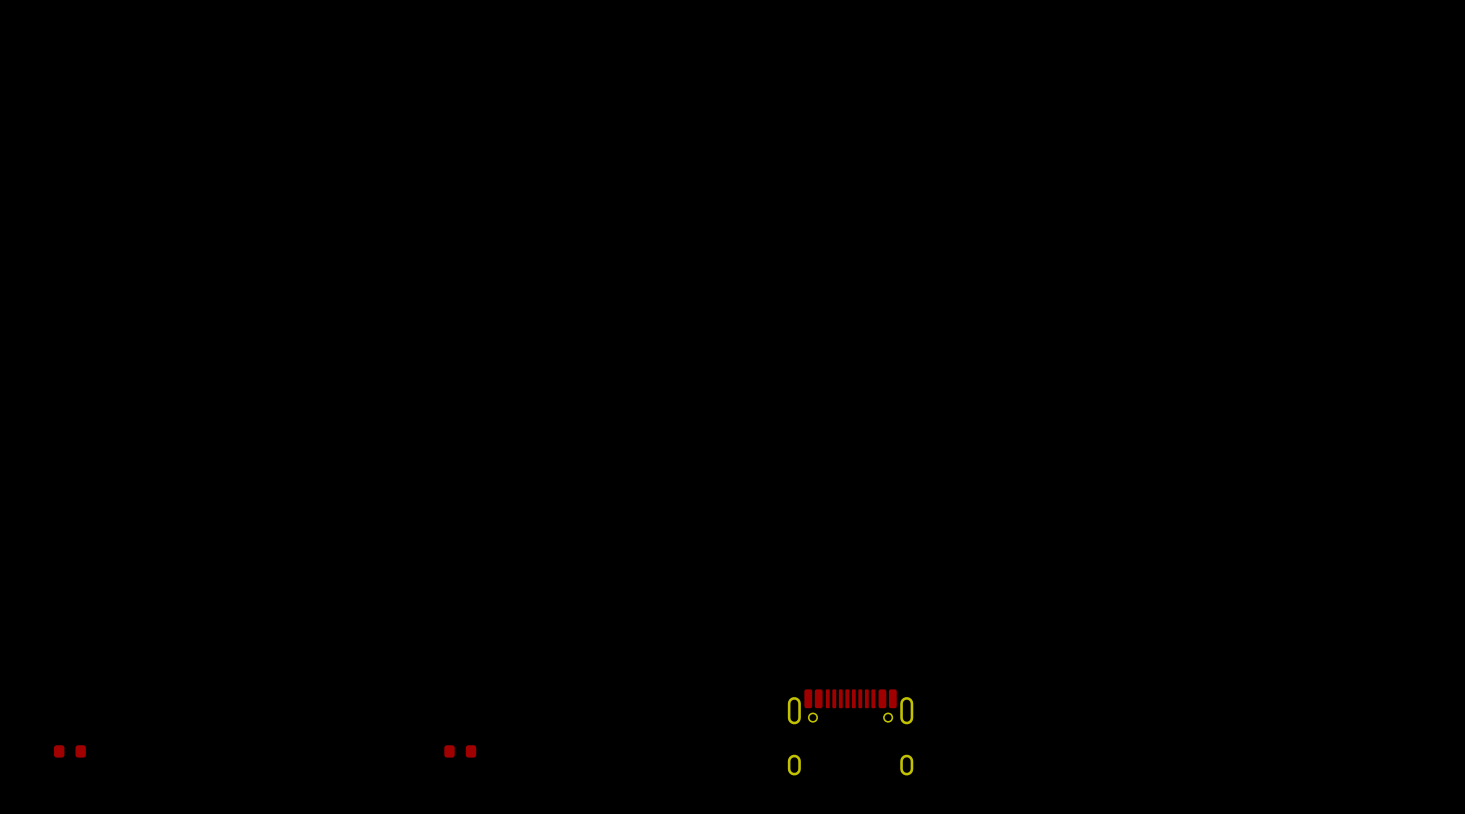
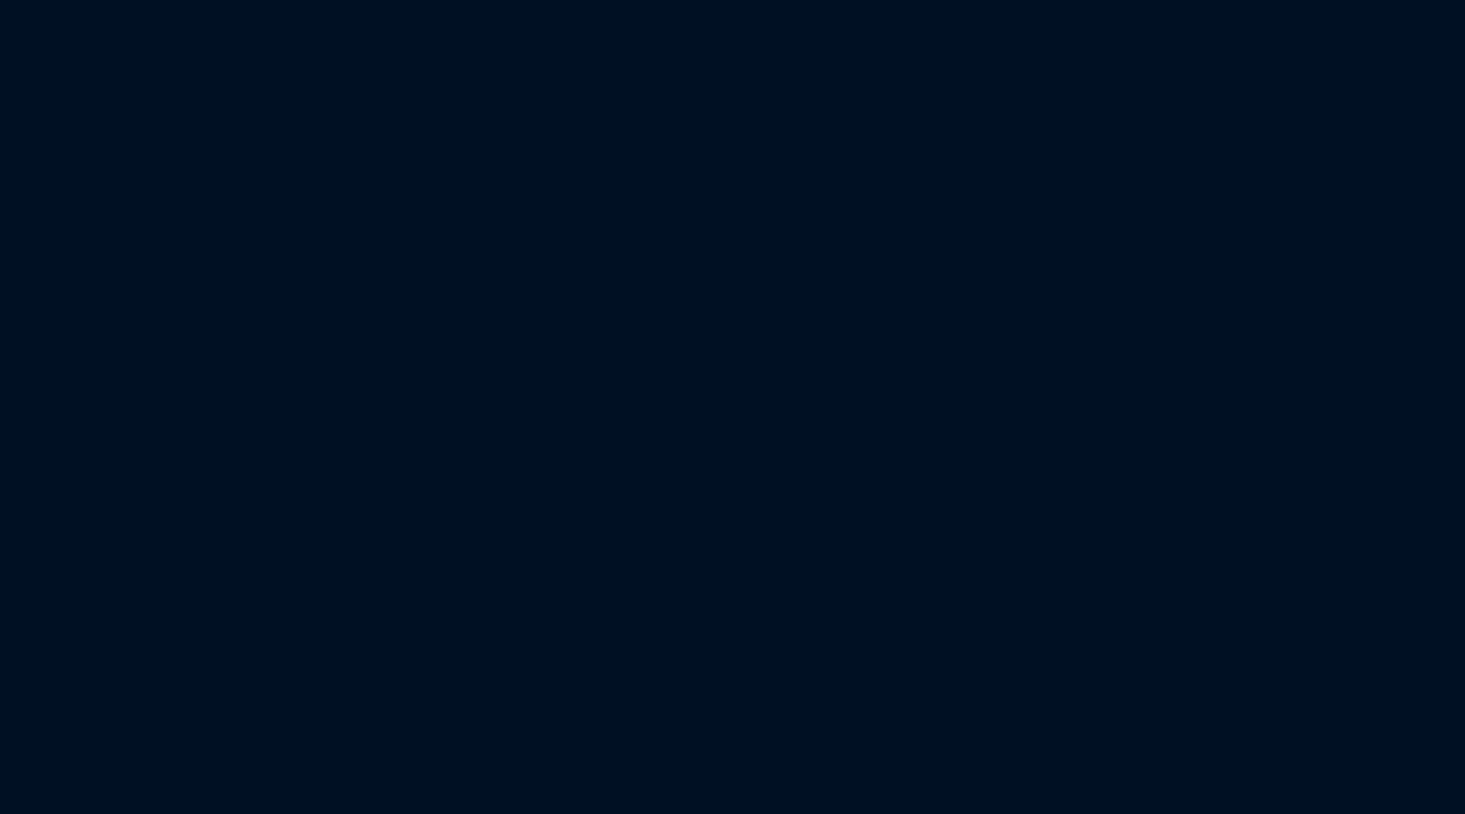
part: (850, 732) -> none
part: (69, 751) -> none
part: (460, 751) -> none

